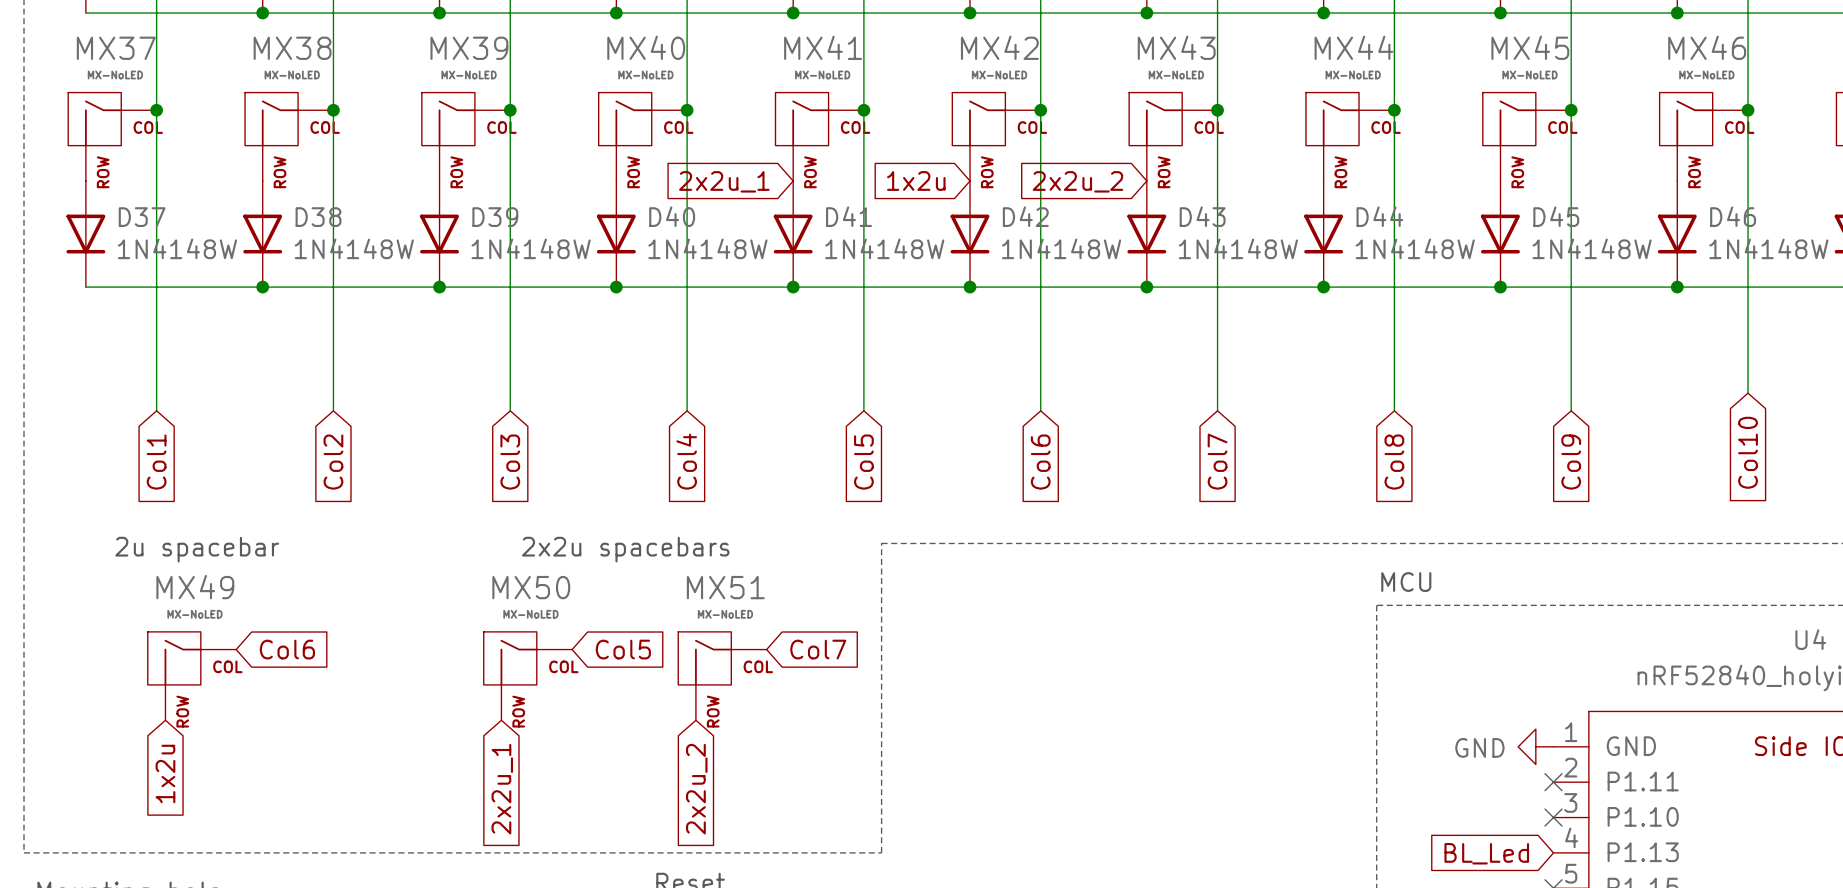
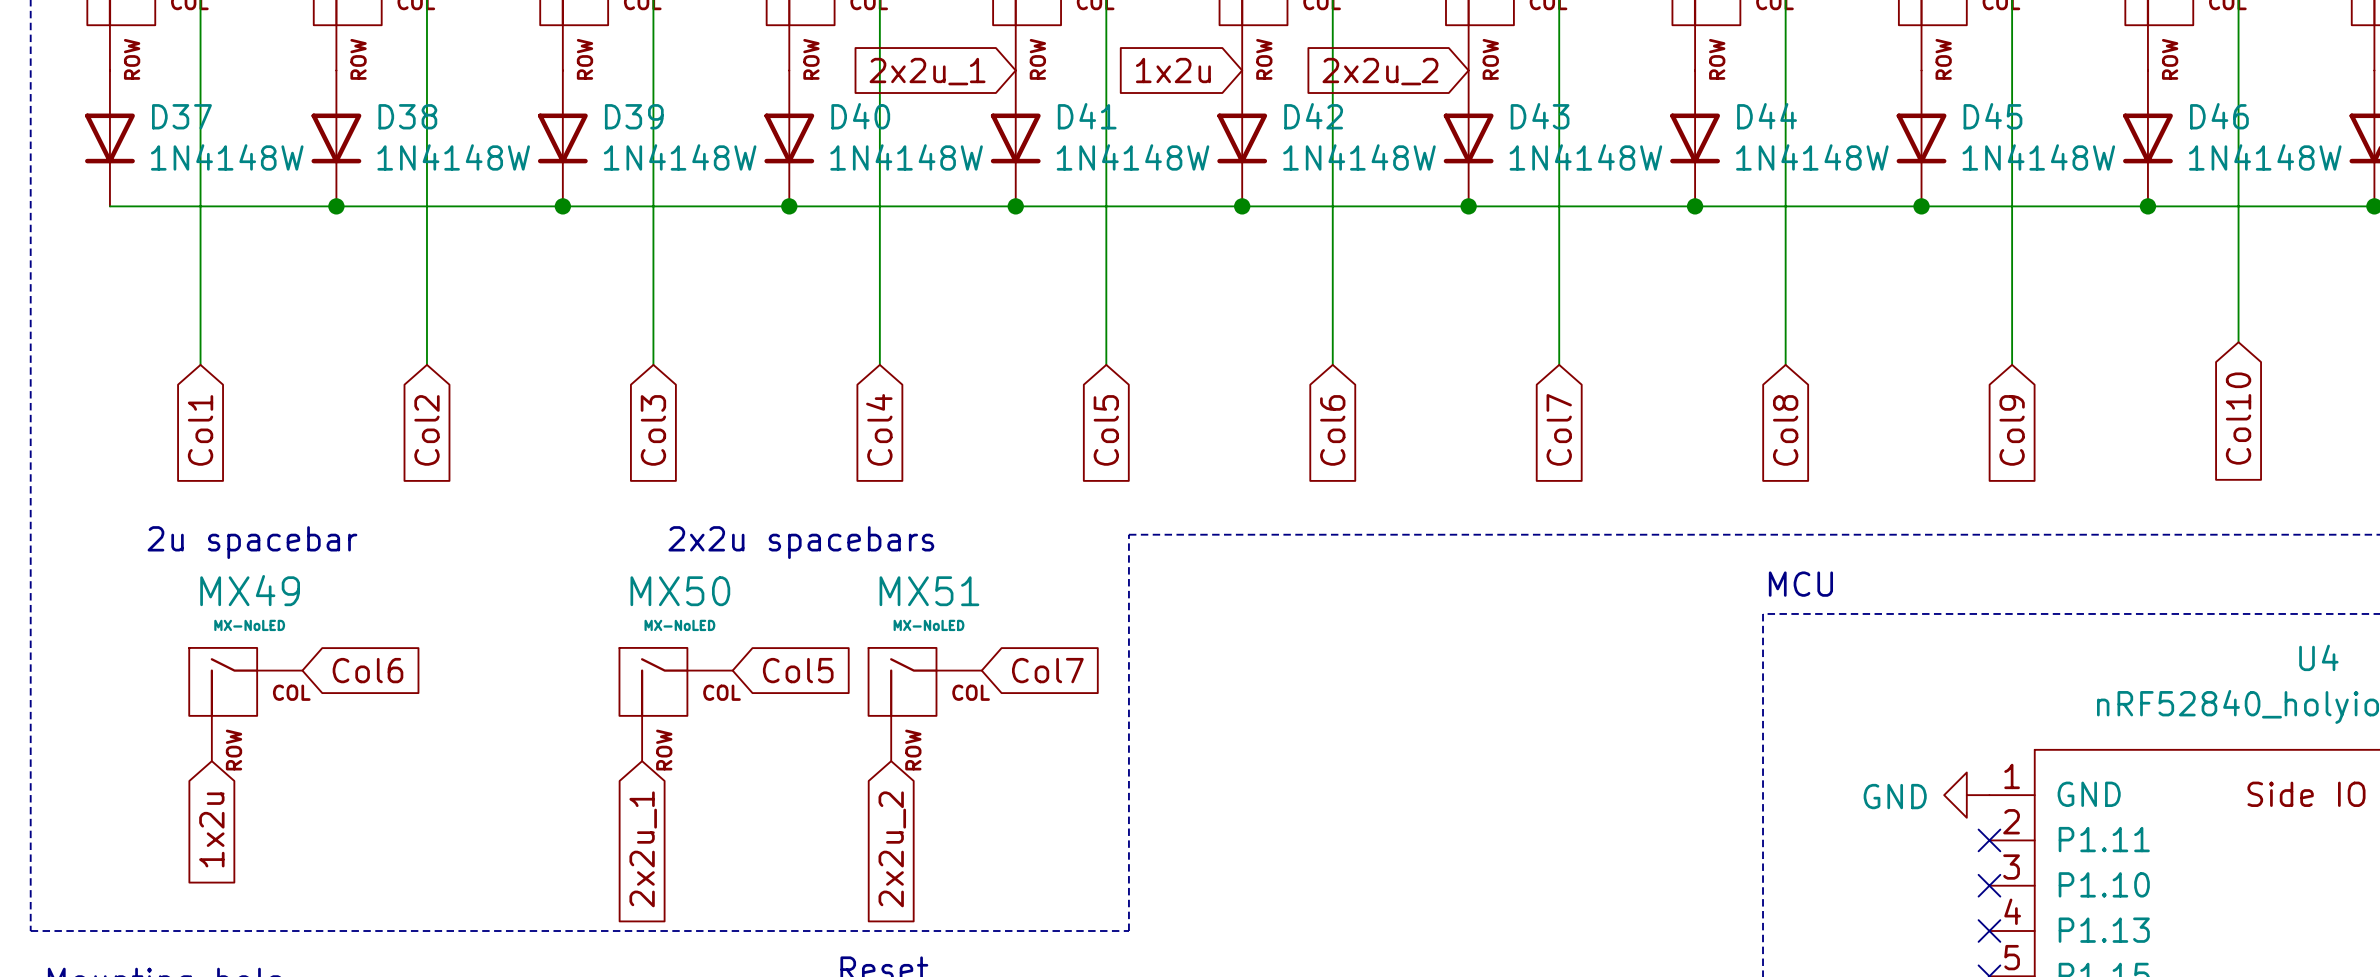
no-connect mark: none -> (1989, 931)
global label: BL_Led (1486, 853) -> none

